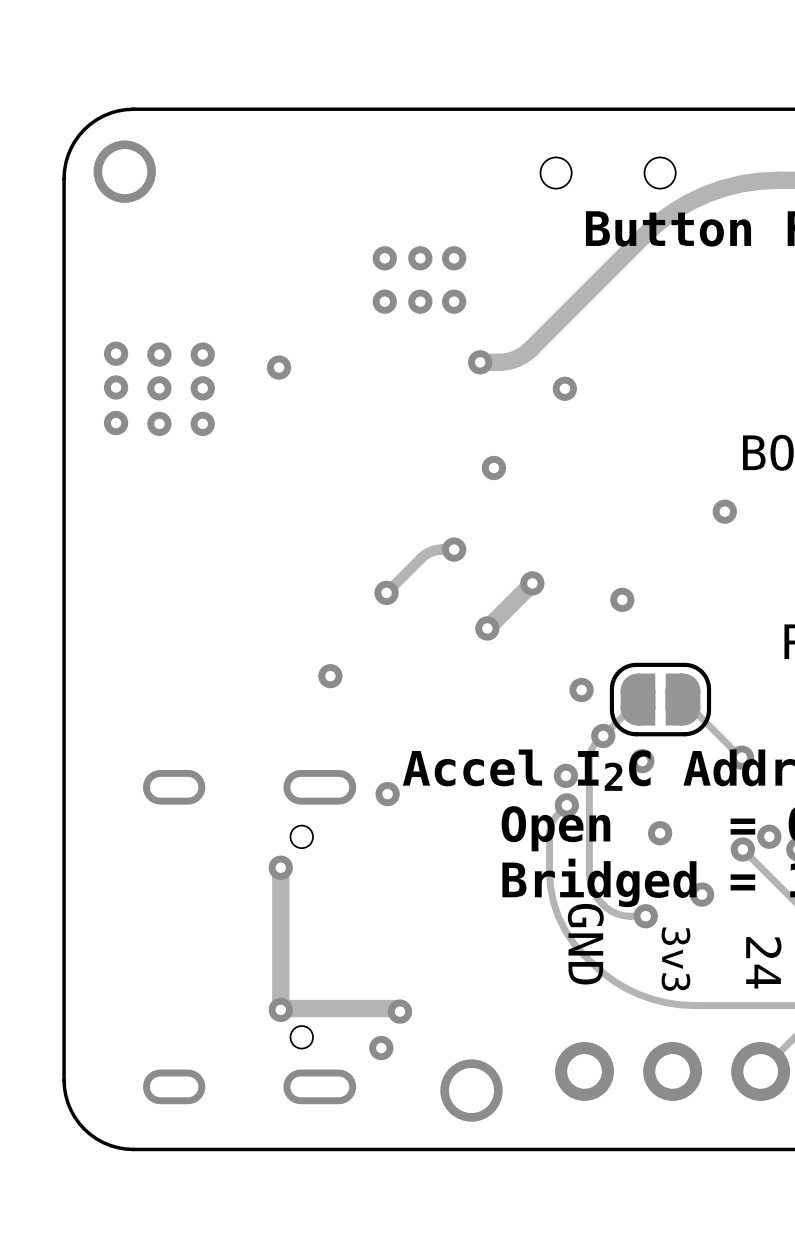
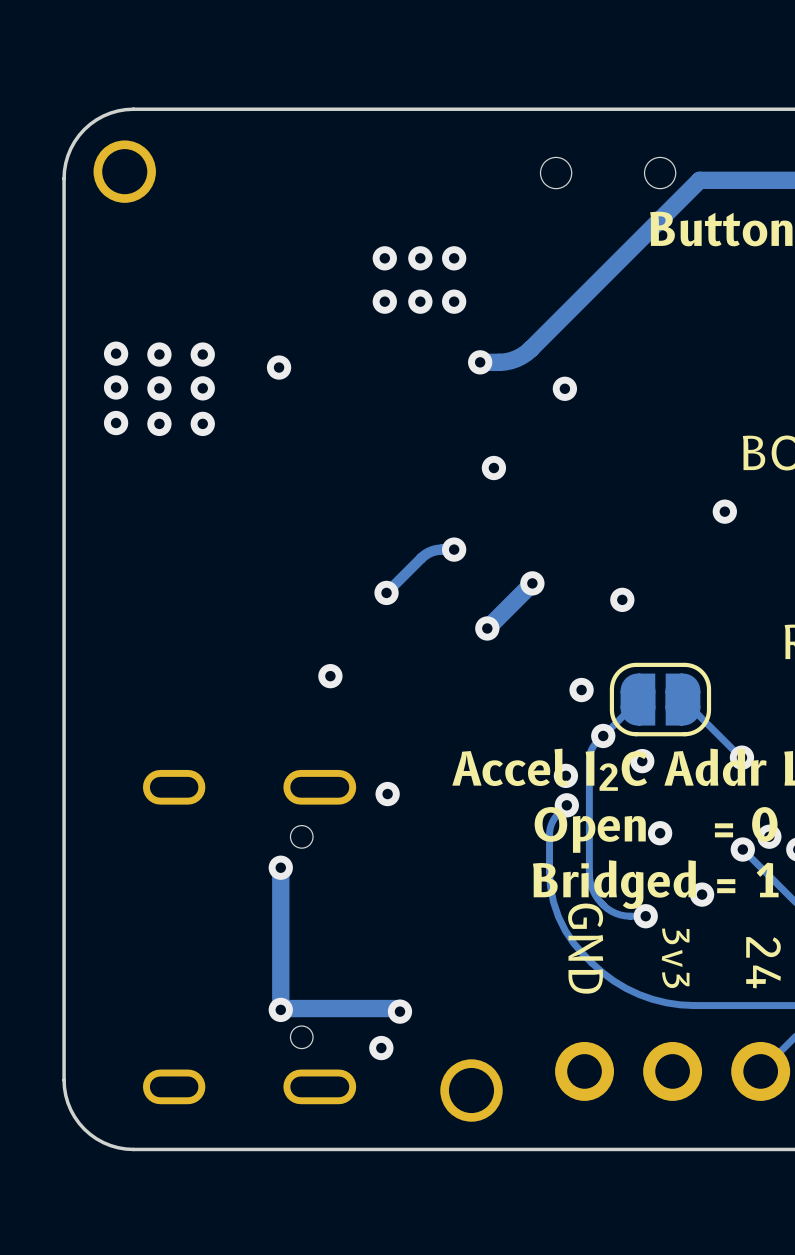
track: (777, 180) (740, 183) (705, 194) (672, 212) (644, 235) -> (777, 180) (699, 180) (644, 235)

